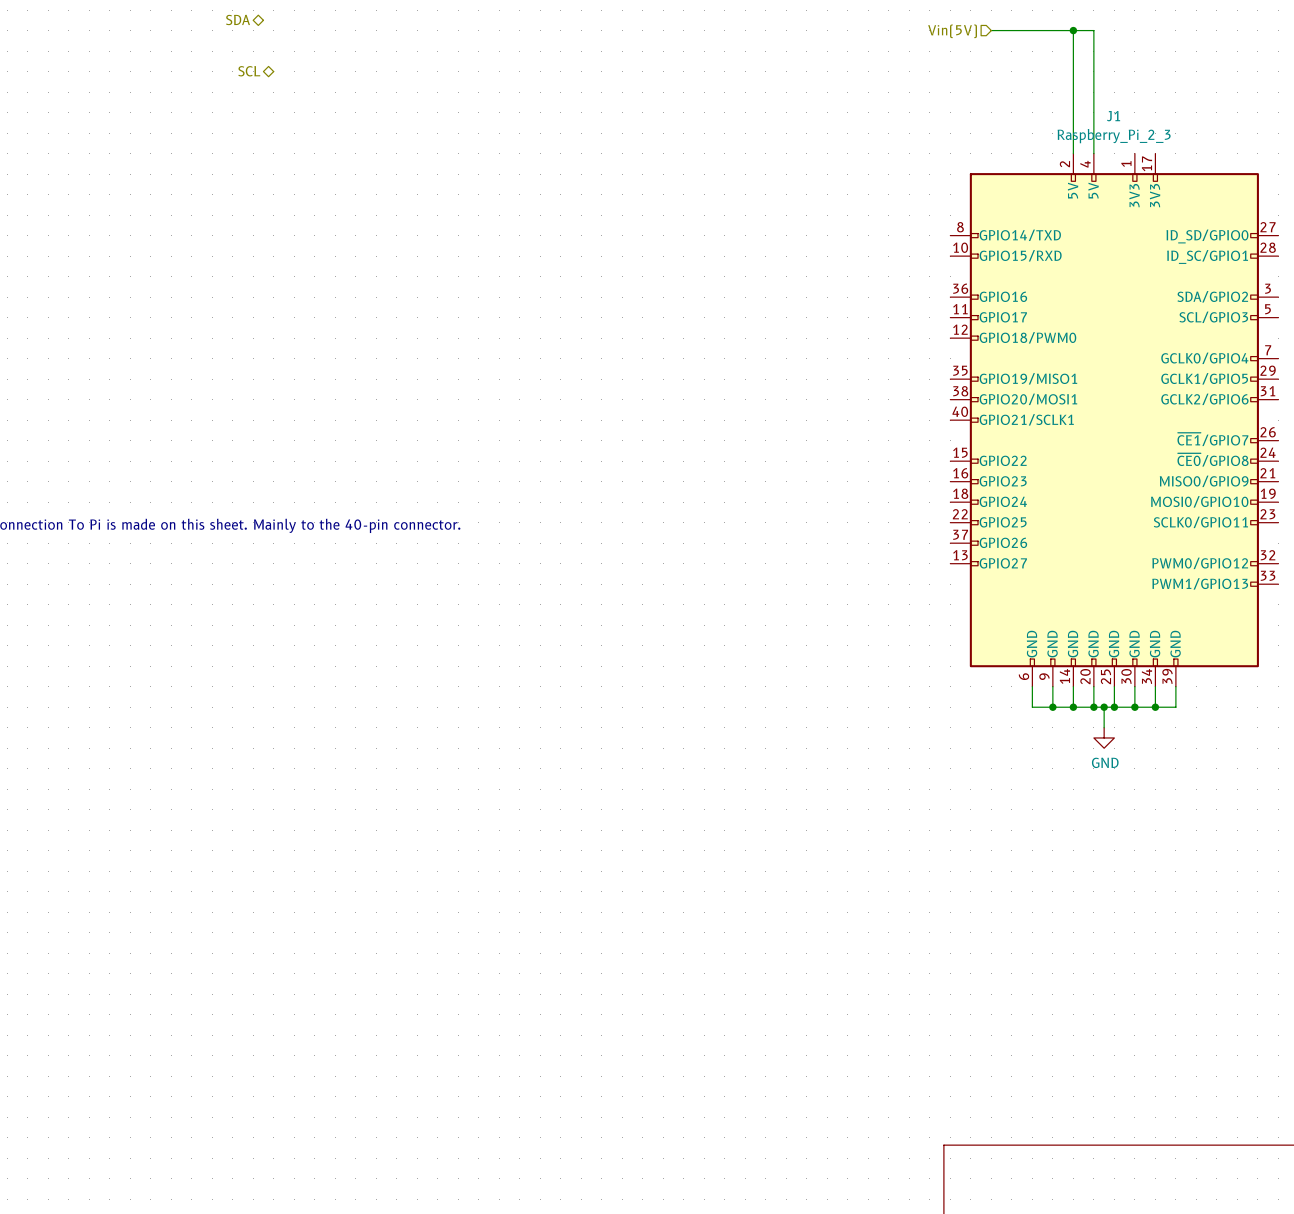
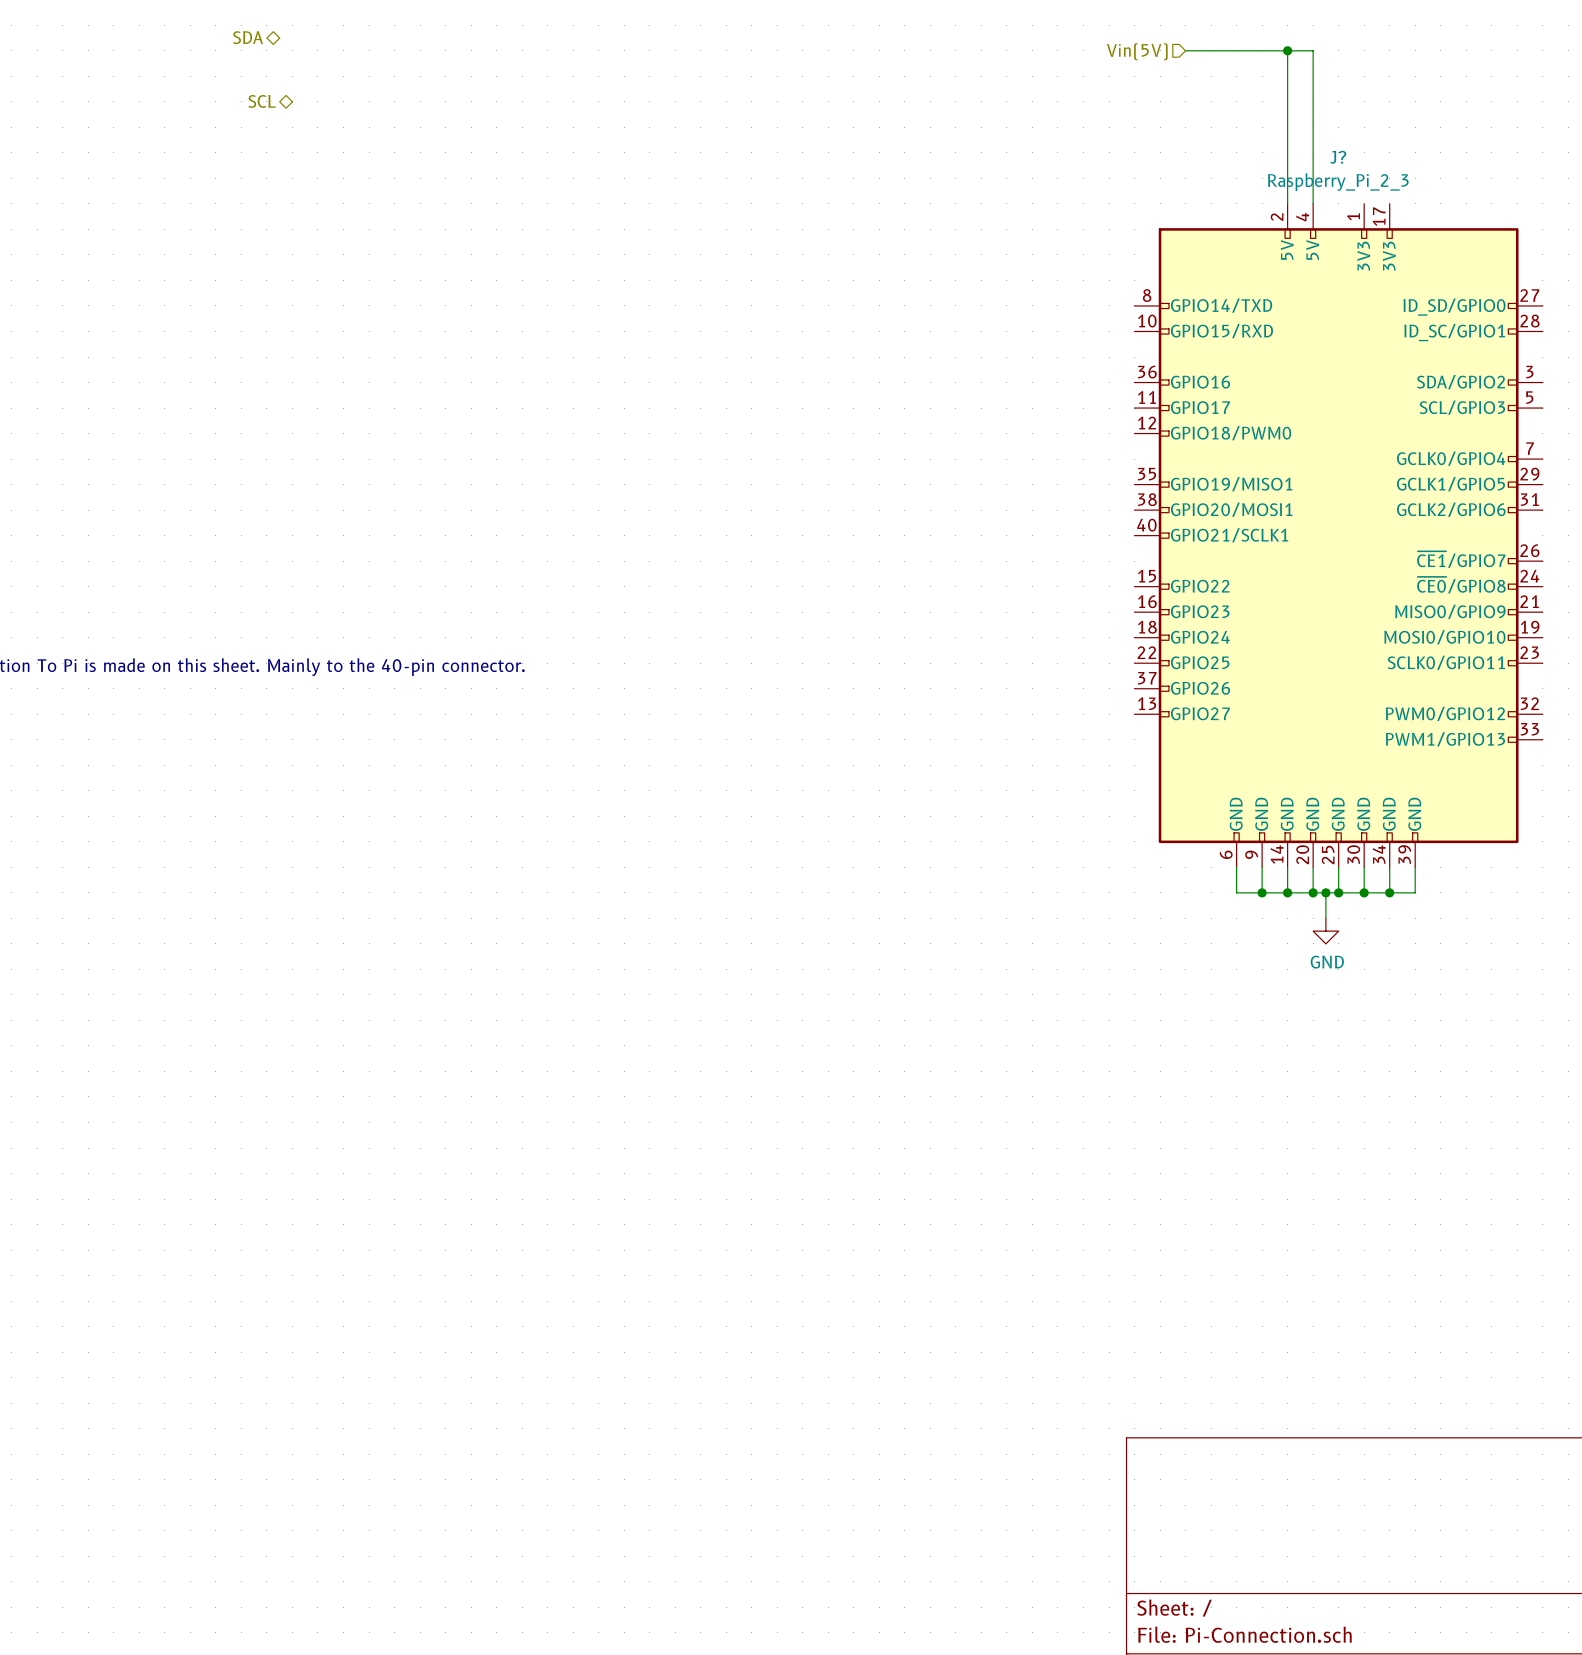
J1 name: J1 (1113, 116) -> J? (1338, 157)

